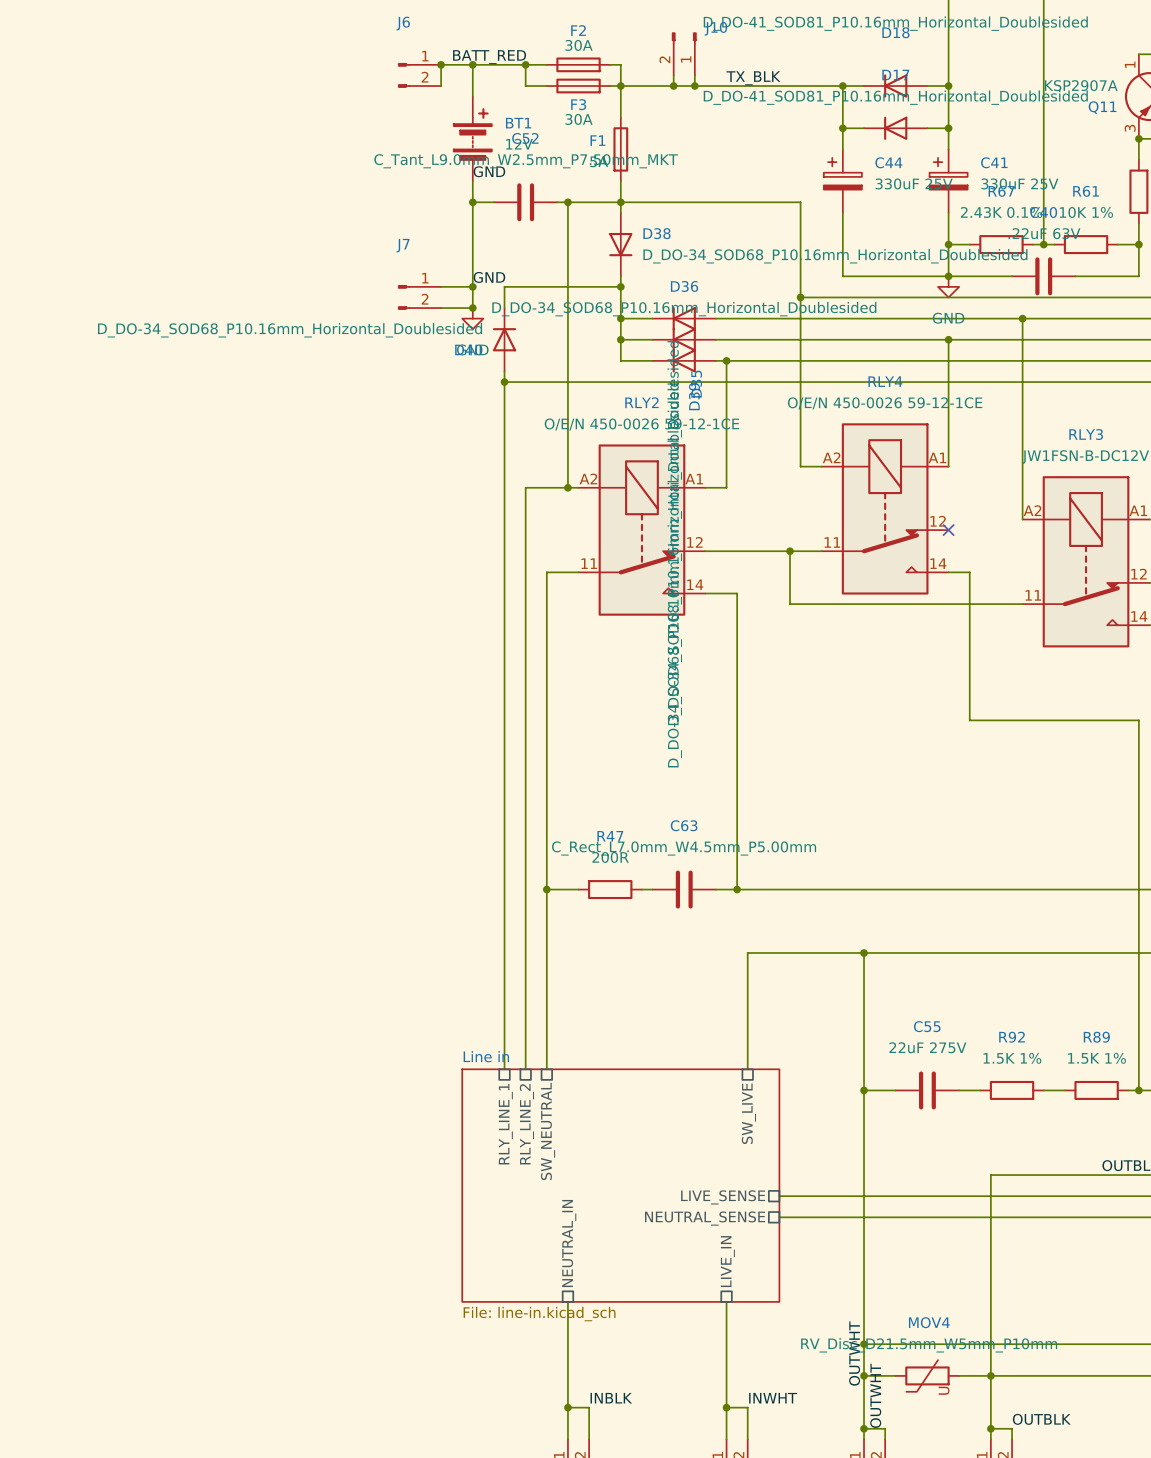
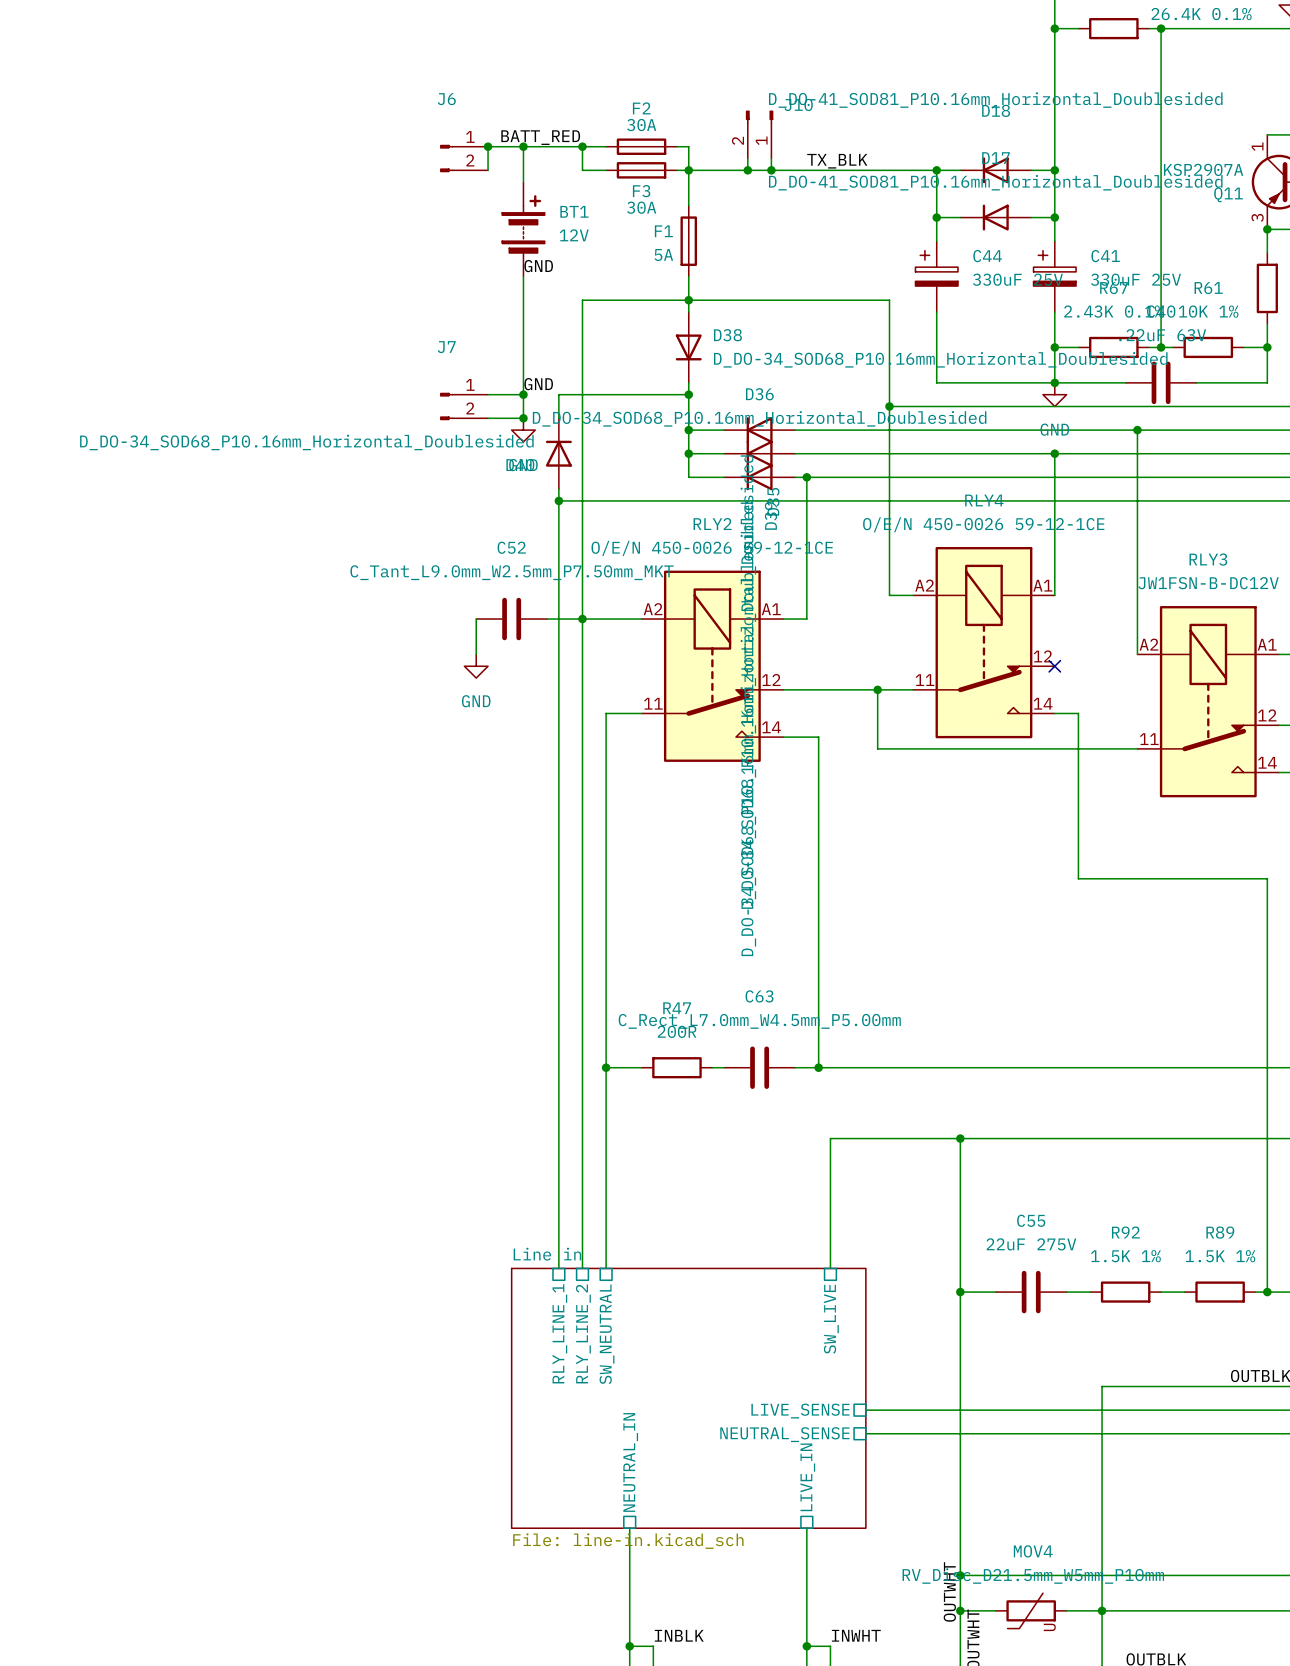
wire: (472, 202) (493, 202) -> none
junction: (472, 202) -> none
C52 position: (525, 202) -> (511, 619)
wire: none -> (617, 300) (582, 300) (582, 619) (547, 619)
wire: (567, 202) (567, 487) -> none
junction: (567, 202) -> none
wire: none -> (476, 619) (476, 654)
junction position: (567, 487) -> (582, 619)
power symbol: none -> GND (476, 666)

